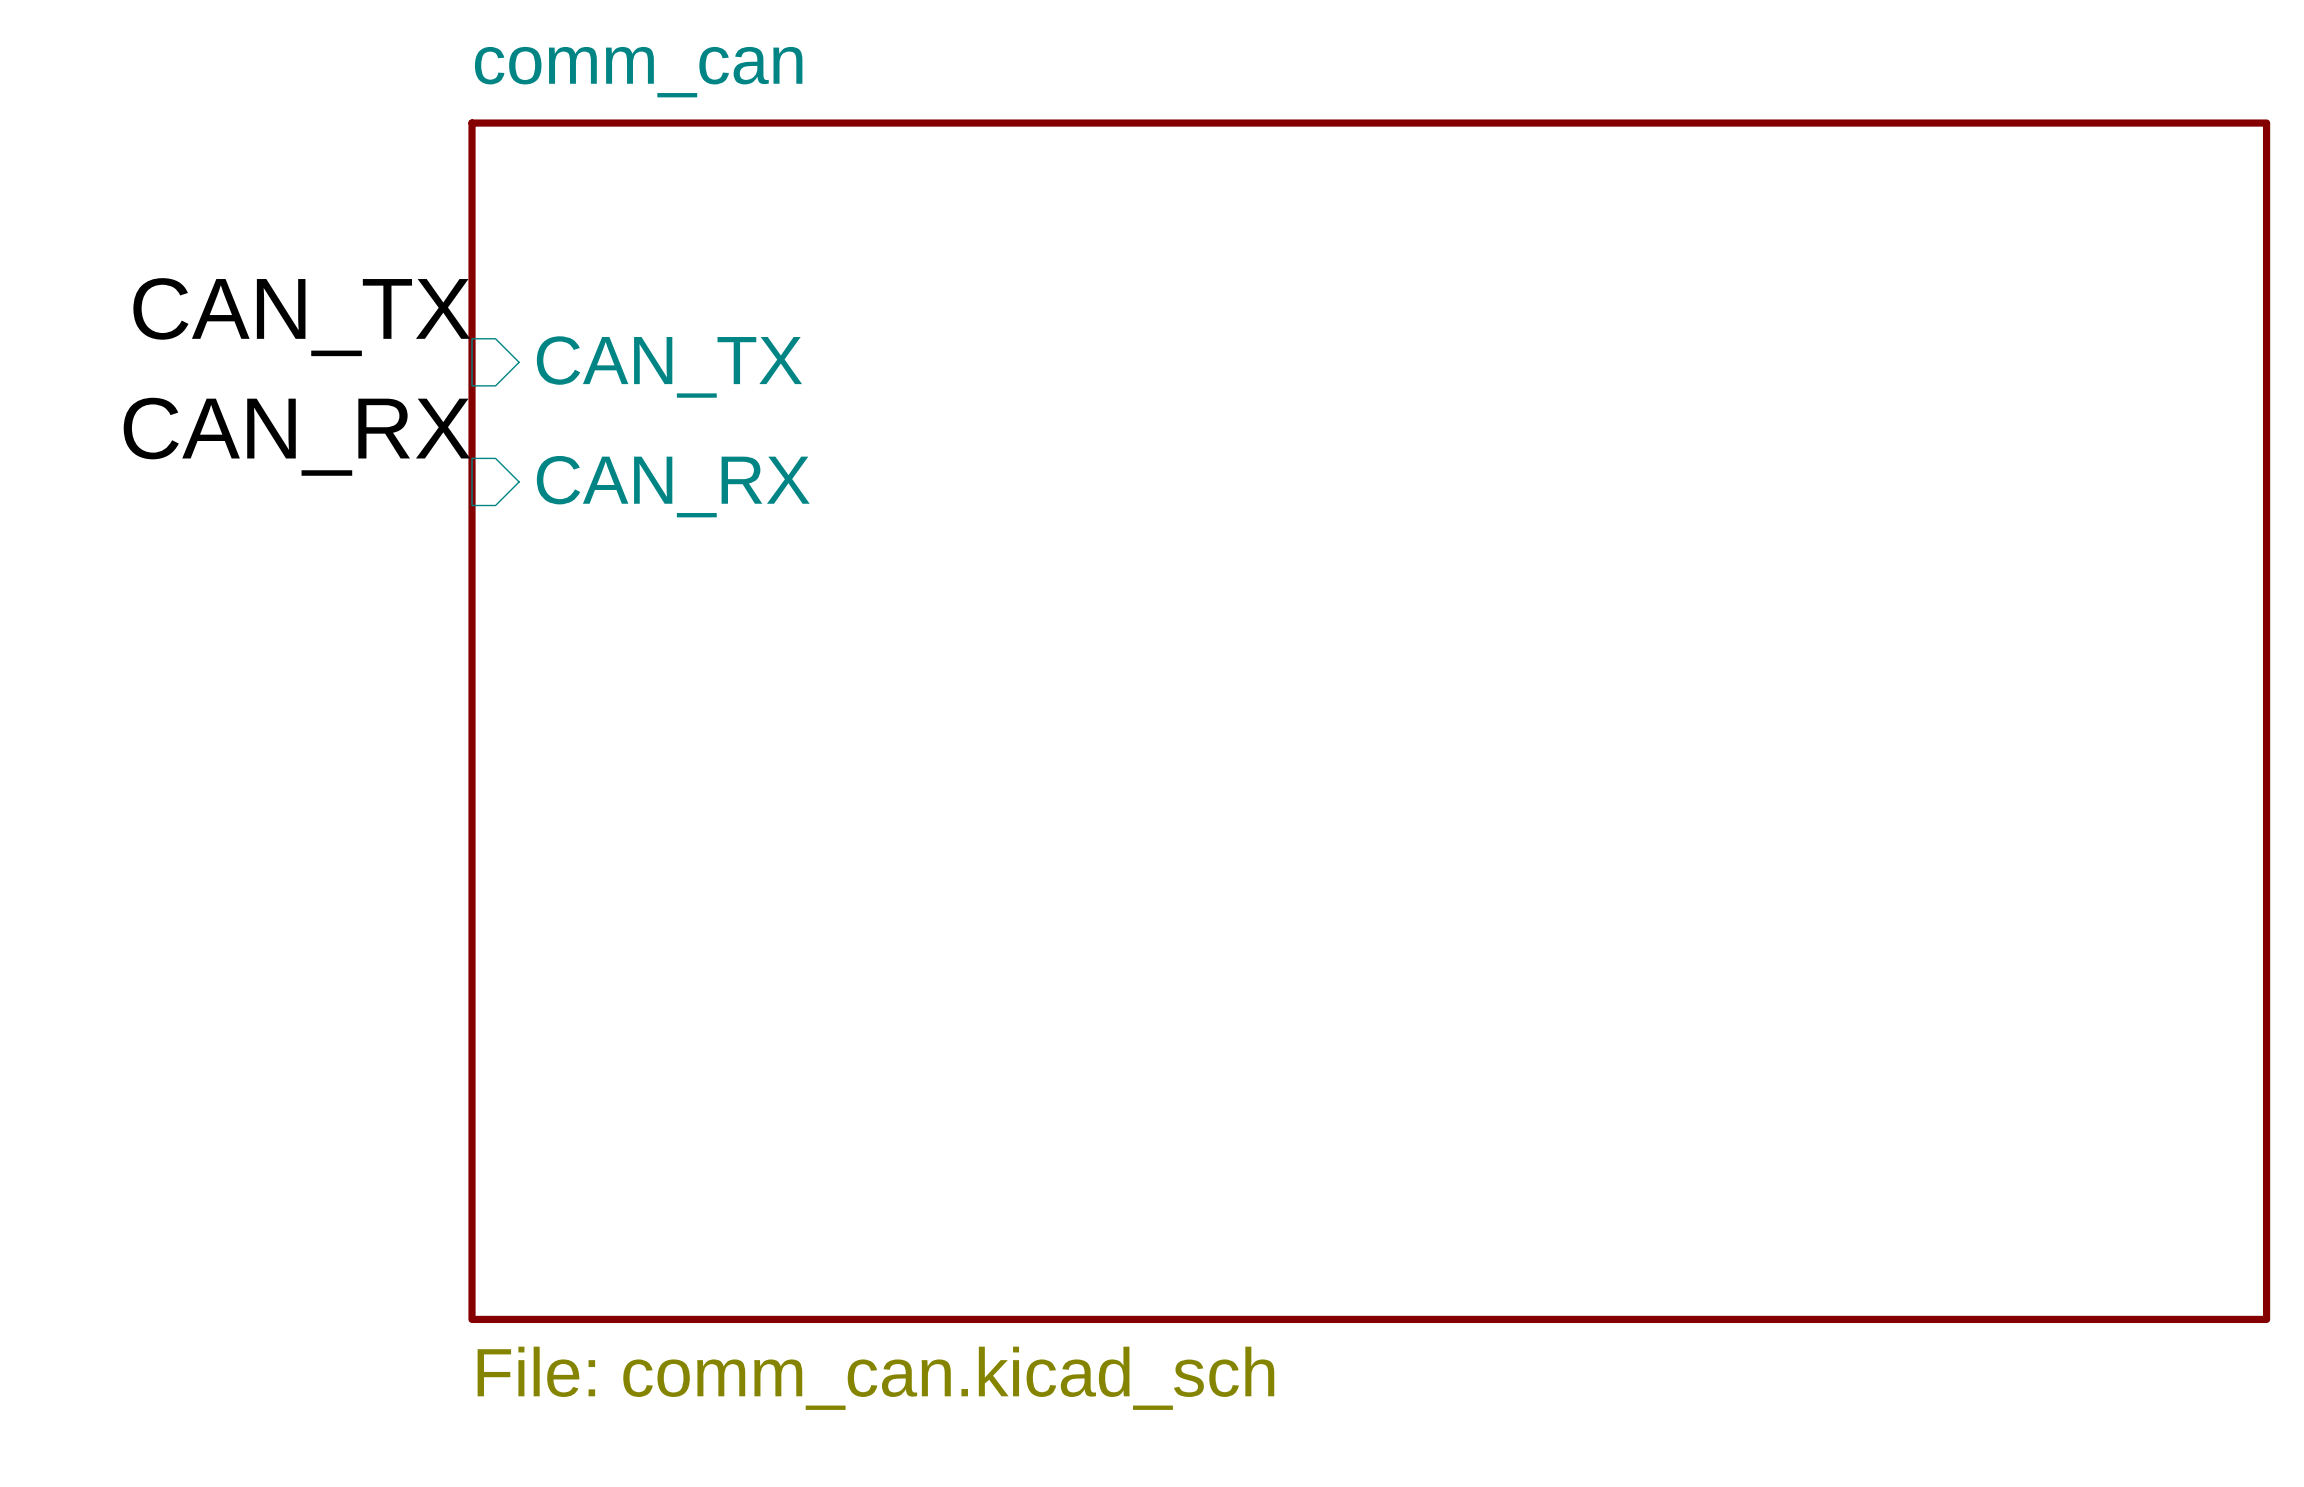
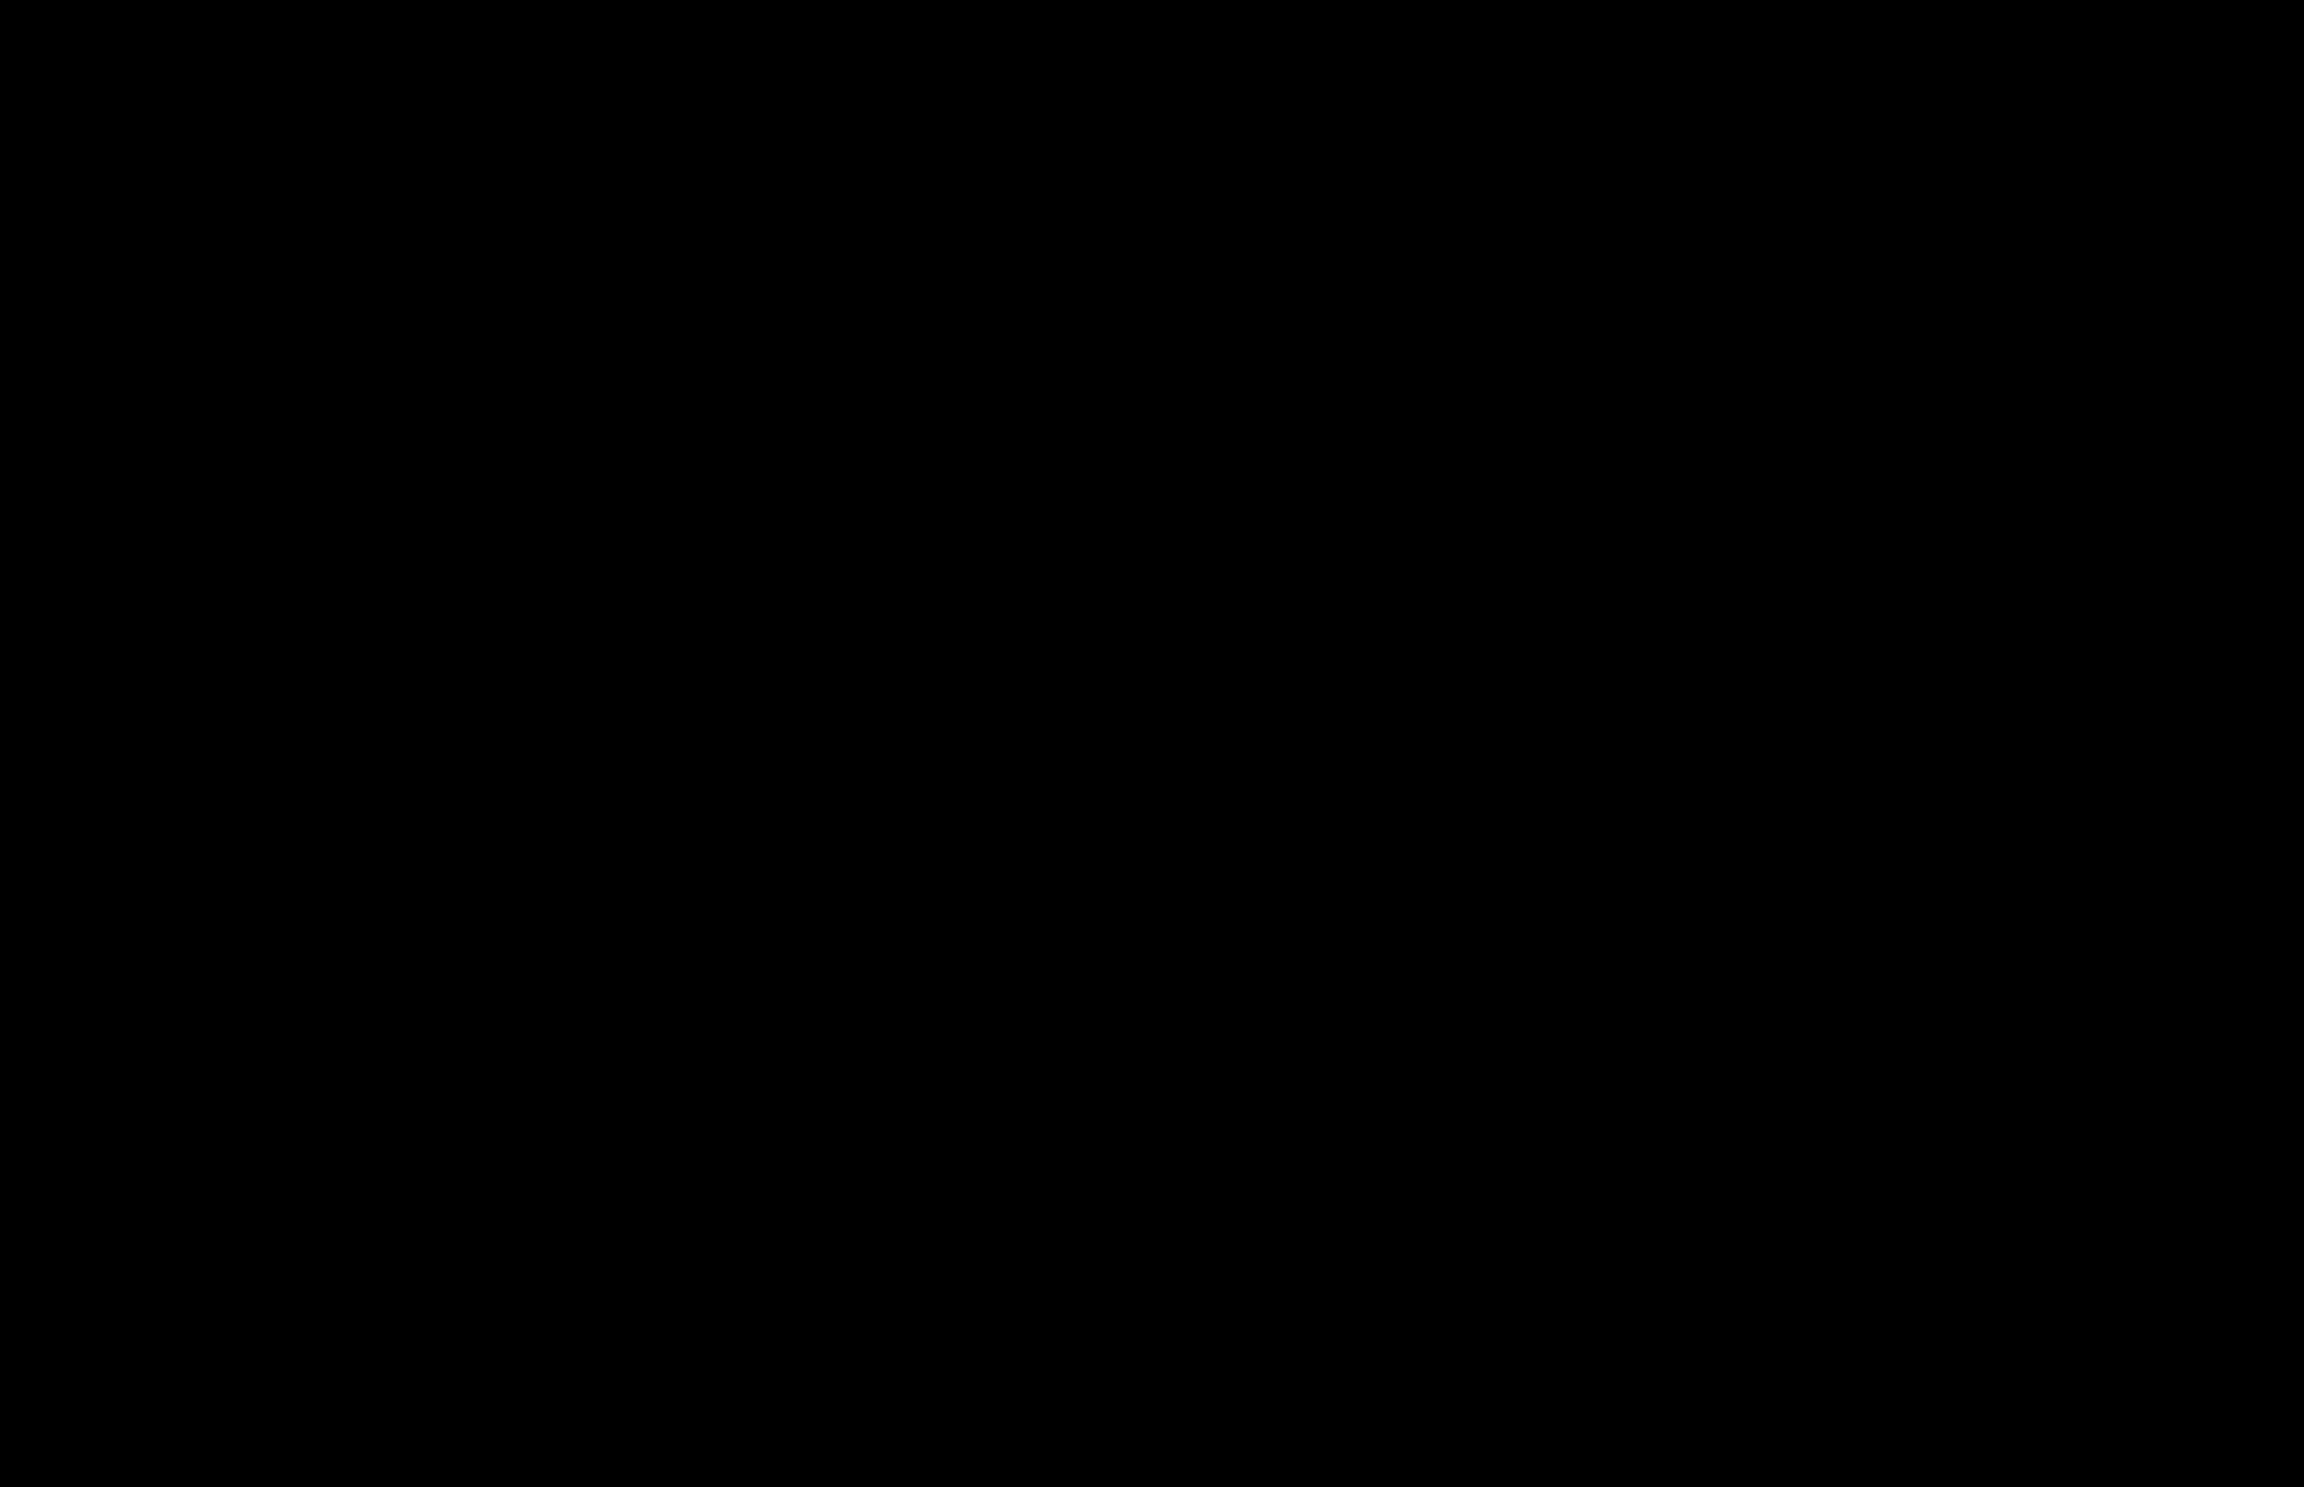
label: CAN_TX (301, 317) -> none
sheet pin: CAN_TX (669, 367) -> none
label: CAN_RX (296, 436) -> none
sheet pin: CAN_RX (673, 486) -> none
sheet comm_can: File: comm_can.kicad_sch (1369, 721) -> none

